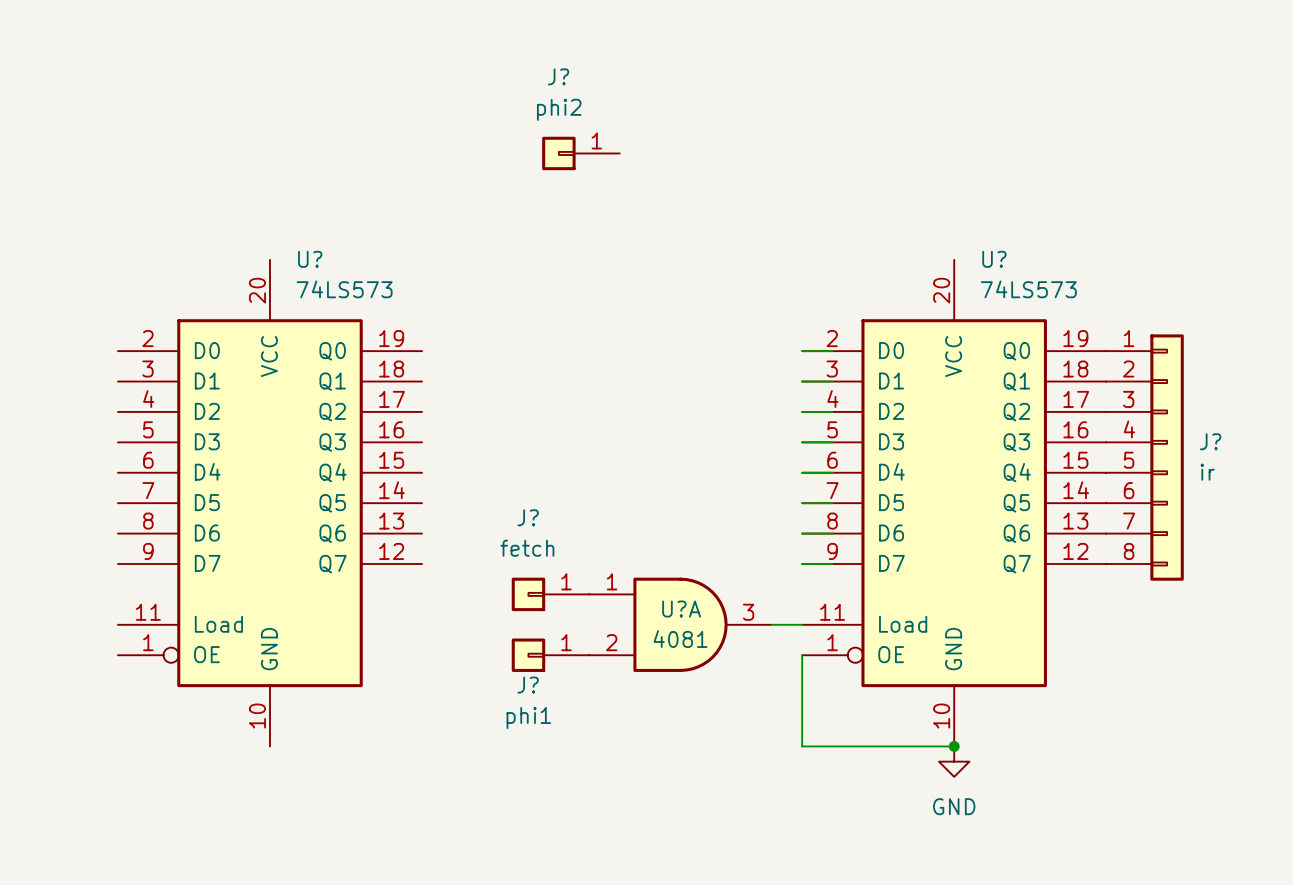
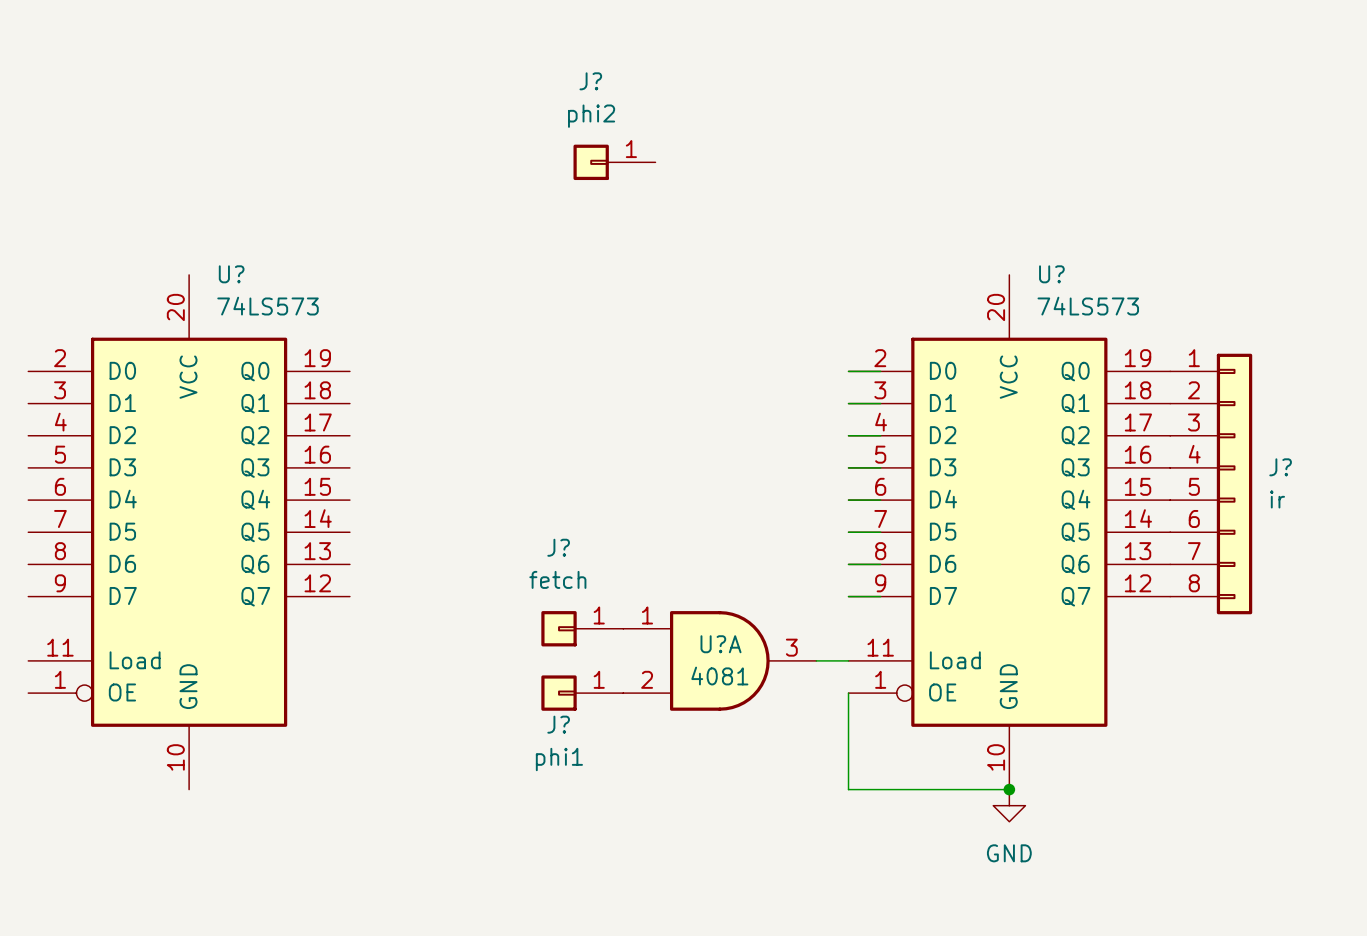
U? position: (269, 503) -> (189, 532)

